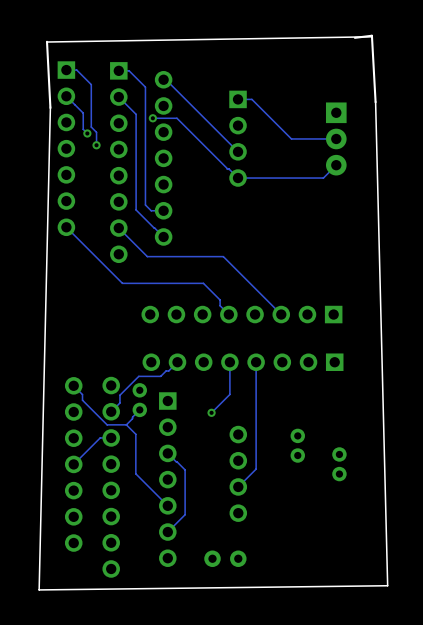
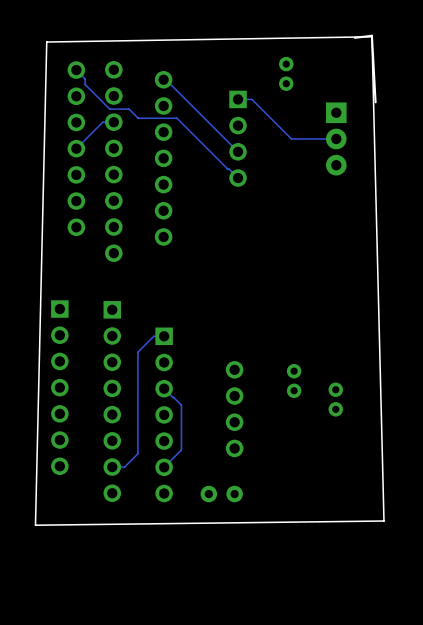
board edge: (47, 41) (50, 108) -> (46, 42) (35, 525) (383, 521) (371, 36)
part footprint: [57, 61, 76, 237] -> [67, 61, 86, 237]
part footprint: [110, 62, 128, 264] -> [105, 61, 123, 262]
track: (66, 70) (76, 70) (91, 84) (91, 127) (96, 132) (96, 145) -> none
track: none -> (76, 70) (85, 78) (85, 84) (109, 109) (129, 109) (138, 118) (152, 118)
track: (118, 70) (129, 70) (145, 87) (145, 205) (151, 210) (163, 210) -> none
part: none -> (286, 73)
track: (66, 96) (83, 113) (83, 129) (87, 133) -> none
track: (118, 97) (136, 114) (136, 209) (163, 236) -> none
board edge: (375, 101) (387, 585) (39, 589) (50, 106) -> none
via: (152, 118) -> none
track: none -> (113, 122) (102, 122) (76, 148)
via: (87, 133) -> none
via: (96, 145) -> none
track: (336, 165) (323, 178) (238, 178) -> none
track: (66, 227) (122, 283) (203, 283) (220, 300) (220, 305) (228, 314) -> none
track: (118, 228) (147, 256) (223, 256) (281, 314) -> none
part: (241, 314) -> none
track: none -> (164, 336) (153, 336) (137, 352) (137, 453) (124, 467) (112, 467)
track: (177, 362) (160, 376) (138, 376) (119, 395) (119, 402) (111, 411) -> none
track: (229, 362) (229, 394) (211, 412) -> none
part: (243, 362) -> none
track: (256, 362) (256, 469) (238, 486) -> none
part: none -> (294, 380)
track: (73, 385) (82, 394) (82, 400) (107, 424) (126, 424) -> none
part: none -> (59, 387)
part: none -> (335, 399)
part: (139, 400) -> none
part: none -> (112, 401)
track: (139, 409) (126, 424) -> none
via: (211, 412) -> none
track: (126, 424) (135, 434) (135, 473) (167, 505) -> none
track: (111, 437) (100, 437) (73, 464) -> none
part: (297, 445) -> none
track: (167, 453) (185, 469) (185, 514) (167, 532) -> (164, 388) (181, 405) (181, 450) (164, 467)
part: (73, 464) -> none
part: (339, 464) -> none
part position: (238, 473) -> (234, 409)
part: (111, 477) -> none
part position: (167, 479) -> (164, 414)
part position: (225, 558) -> (221, 494)

